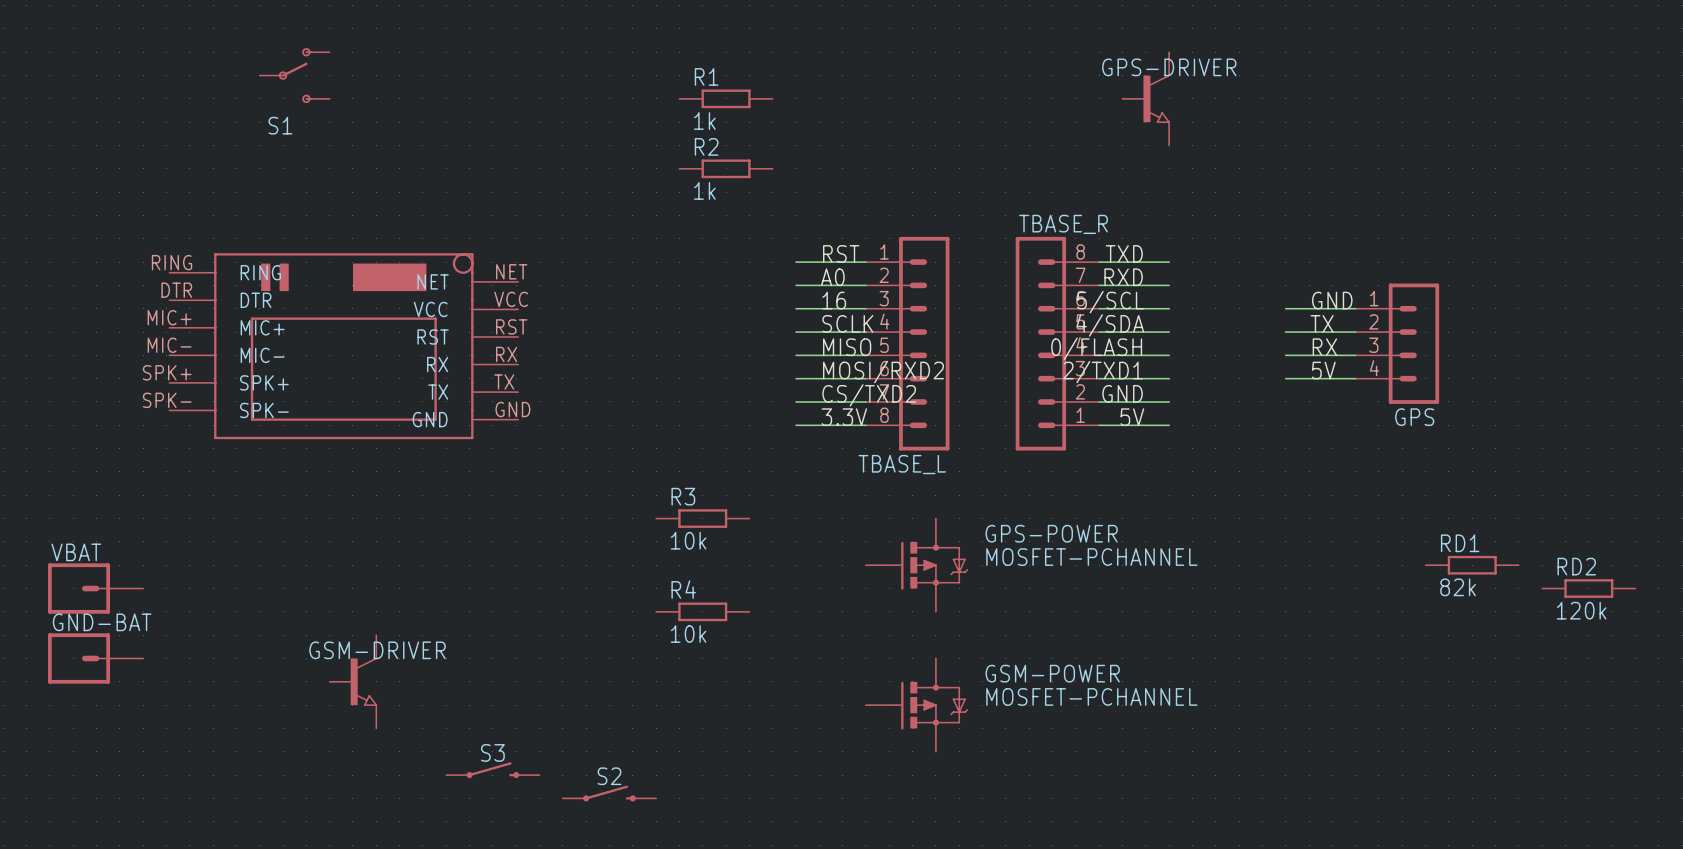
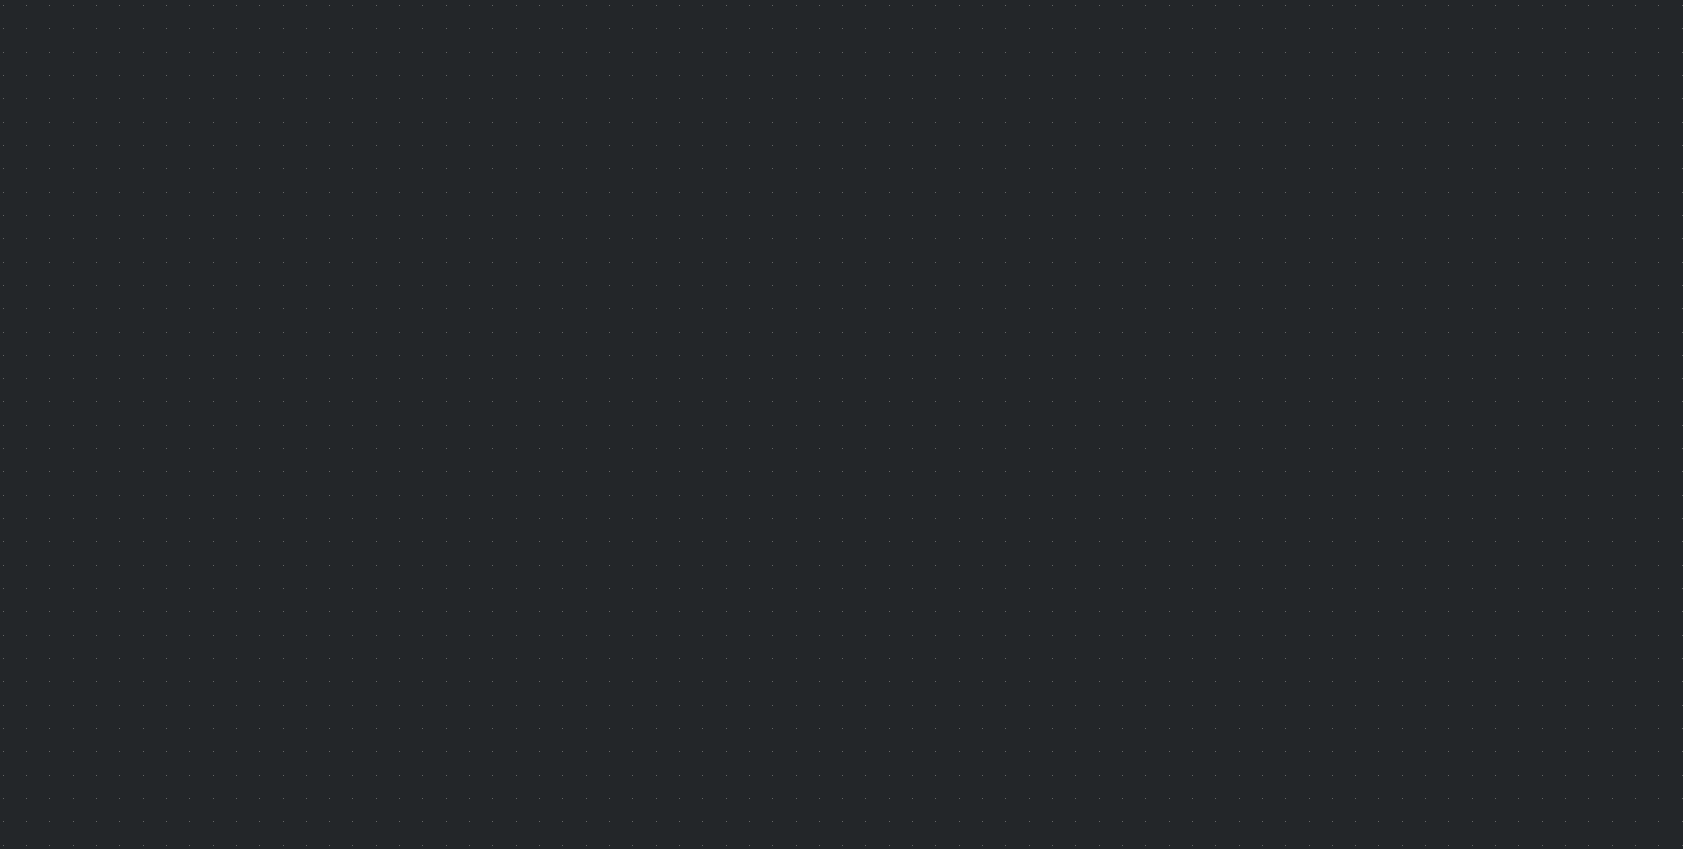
S1: (294, 75) -> none
R1: 1k (726, 98) -> none
GPS-DRIVER: (1146, 98) -> none
R2: 1k (726, 168) -> none
label: RST (841, 253) -> none
label: TXD (1124, 253) -> none
wire: (796, 262) (865, 262) -> none
wire: (1099, 262) (1169, 262) -> none
label: A0 (832, 277) -> none
label: RXD (1123, 277) -> none
wire: (796, 285) (865, 285) -> none
wire: (1099, 285) (1169, 285) -> none
label: 16 (834, 300) -> none
label: GND (1332, 300) -> none
label: 5/SCL (1110, 302) -> none
wire: (796, 308) (865, 308) -> none
wire: (1099, 308) (1169, 308) -> none
wire: (1285, 308) (1355, 308) -> none
label: SCLK (847, 323) -> none
label: TX (1322, 323) -> none
label: 4/SDA (1110, 325) -> none
wire: (796, 332) (865, 332) -> none
wire: (1099, 332) (1169, 332) -> none
wire: (1285, 332) (1355, 332) -> none
TBASE_L: (907, 343) -> none
TBASE_R: (1057, 343) -> none
GPS: (1397, 343) -> none
part: (343, 346) -> none
label: MISO (847, 347) -> none
label: RX (1324, 347) -> none
label: 0/FLASH (1096, 348) -> none
wire: (796, 355) (865, 355) -> none
wire: (1099, 355) (1169, 355) -> none
wire: (1285, 355) (1355, 355) -> none
label: 5V (1323, 370) -> none
label: MOSI/RXD2 (883, 372) -> none
label: 2/TXD1 (1102, 372) -> none
wire: (796, 378) (865, 378) -> none
wire: (1099, 378) (1169, 378) -> none
wire: (1285, 378) (1355, 378) -> none
label: GND (1122, 393) -> none
label: CS/TXD2 (869, 395) -> none
wire: (796, 401) (865, 401) -> none
wire: (1099, 401) (1169, 401) -> none
label: 3.3V (844, 417) -> none
label: 5V (1132, 417) -> none
wire: (796, 425) (865, 425) -> none
wire: (1099, 425) (1169, 425) -> none
R3: 10k (702, 518) -> none
GPS-POWER: MOSFET-PCHANNEL (917, 565) -> none
RD1: 82k (1472, 565) -> none
VBAT: (95, 588) -> none
RD2: 120k (1588, 588) -> none
R4: 10k (702, 611) -> none
GND-BAT: (95, 658) -> none
GSM-DRIVER: (353, 681) -> none
GSM-POWER: MOSFET-PCHANNEL (917, 705) -> none
S3: (492, 770) -> none
S2: (609, 793) -> none

